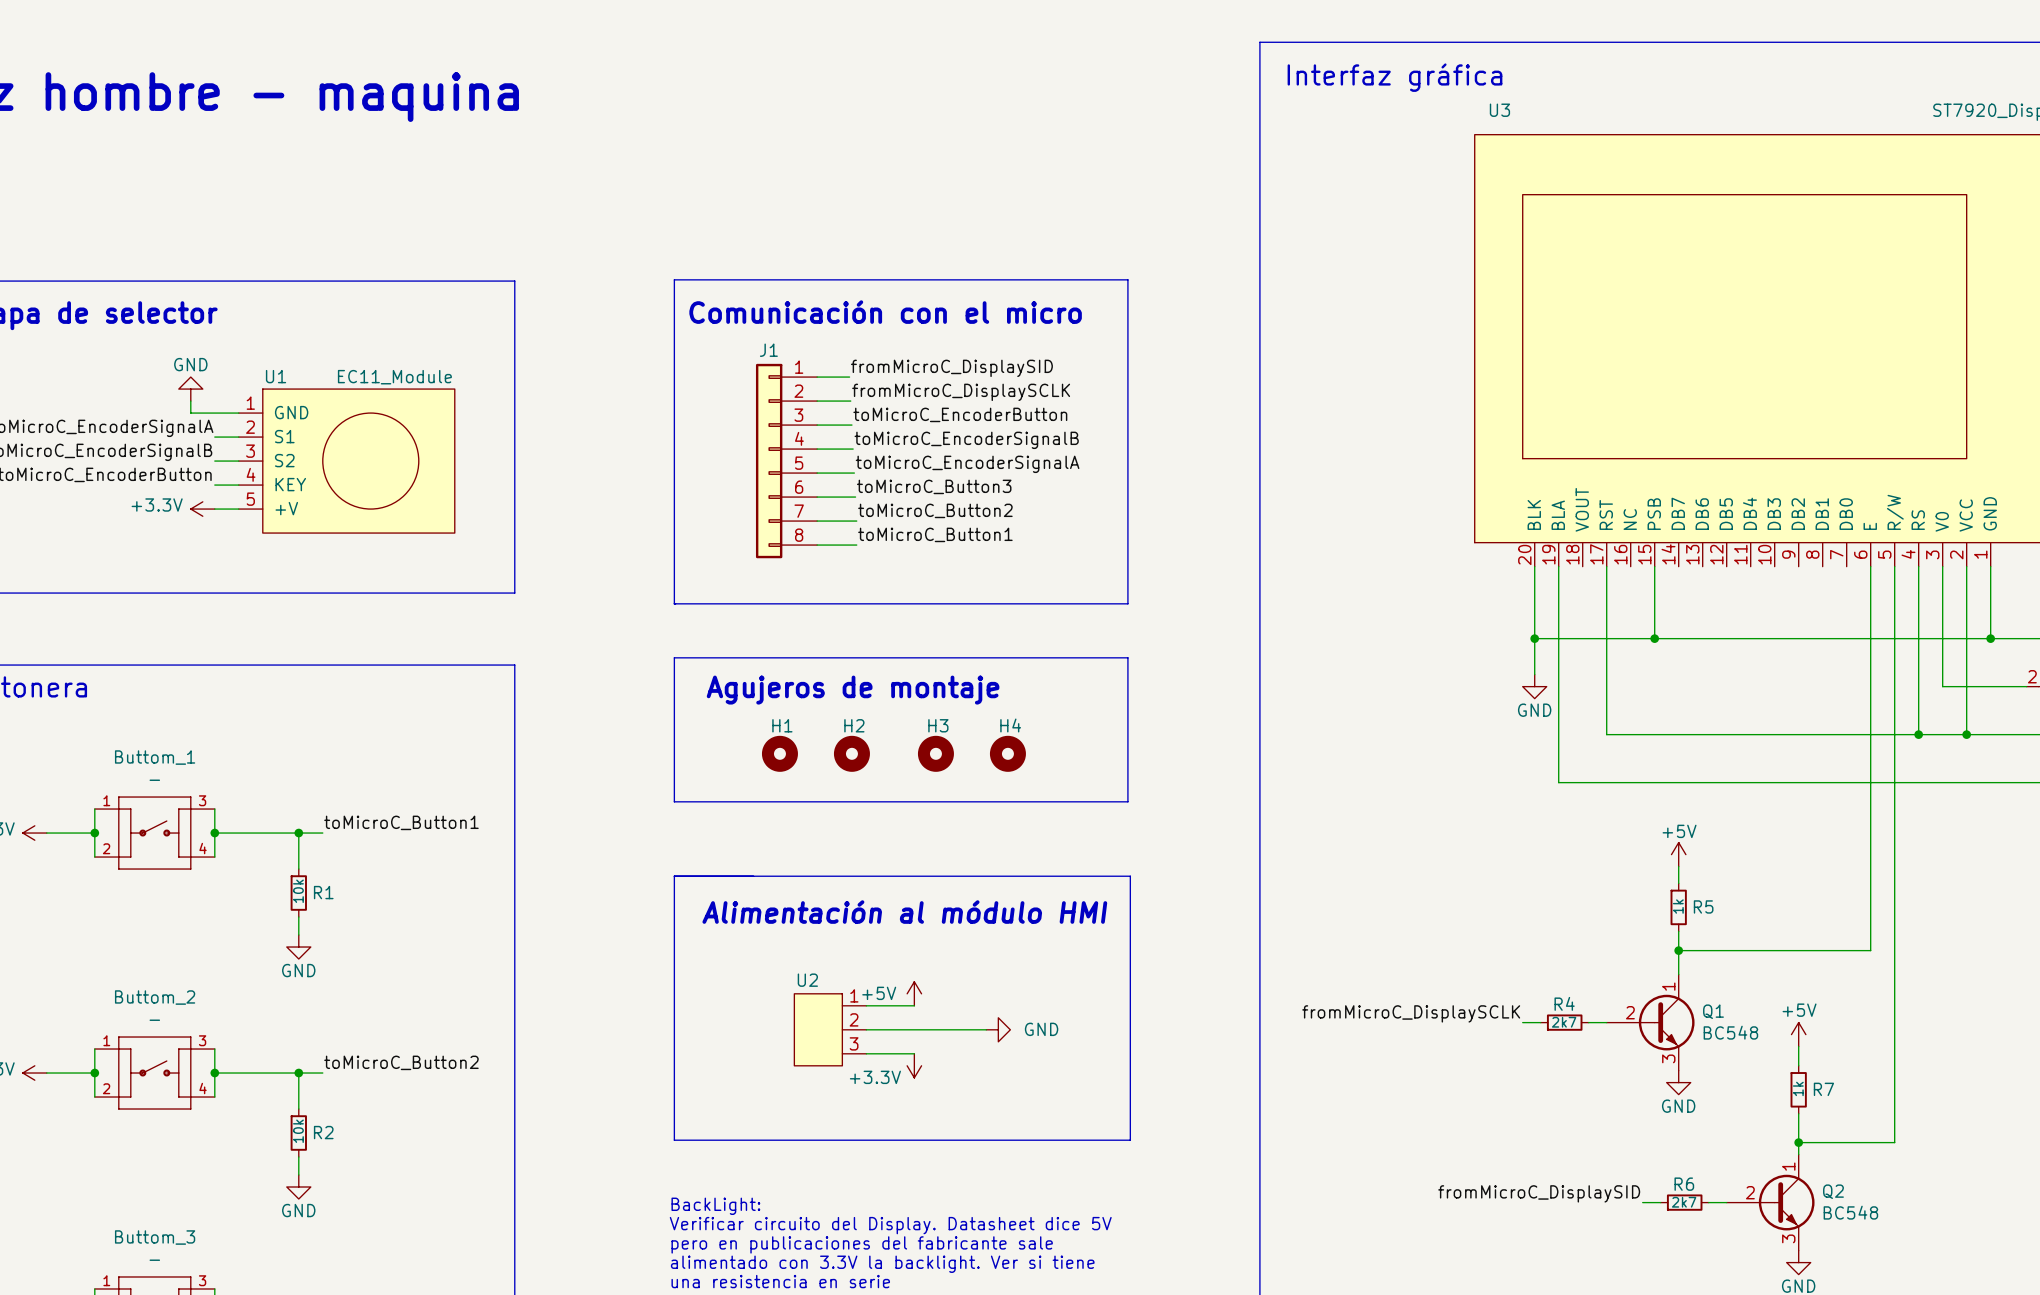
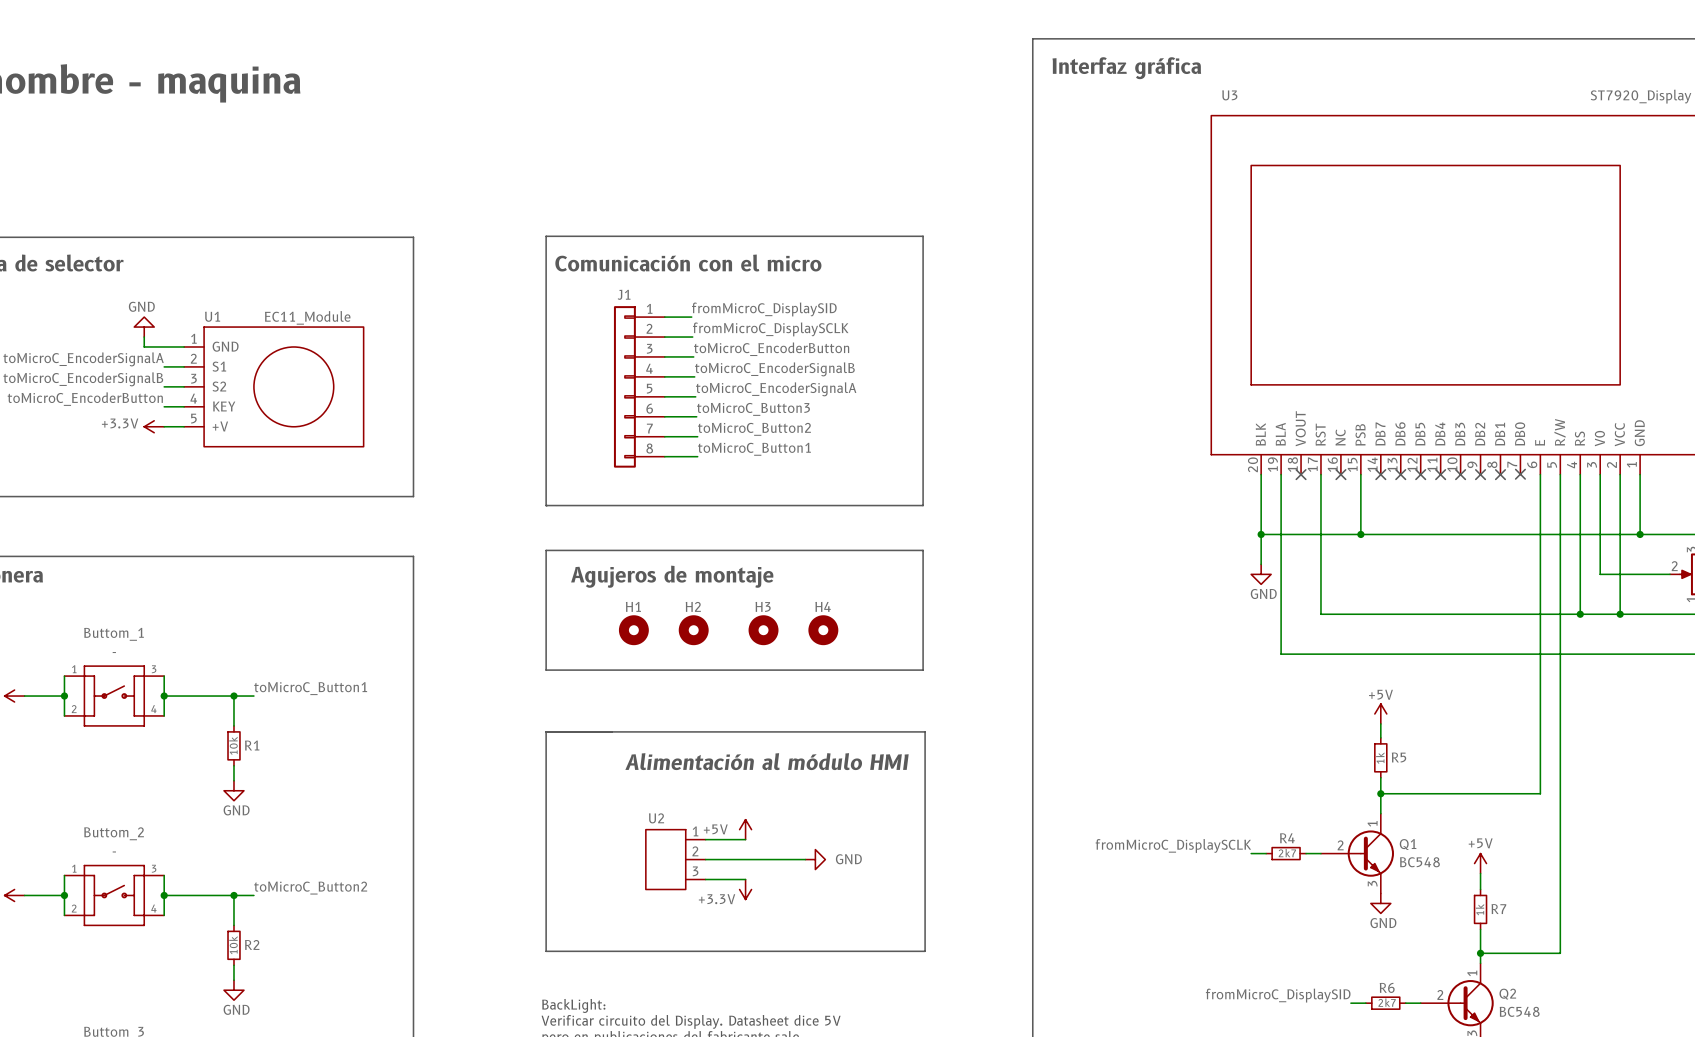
no-connect mark: none -> (1301, 474)
no-connect mark: none -> (1340, 474)
no-connect mark: none -> (1380, 474)
no-connect mark: none -> (1400, 474)
no-connect mark: none -> (1420, 474)
no-connect mark: none -> (1440, 474)
no-connect mark: none -> (1460, 474)
no-connect mark: none -> (1480, 474)
no-connect mark: none -> (1500, 474)
no-connect mark: none -> (1520, 474)

